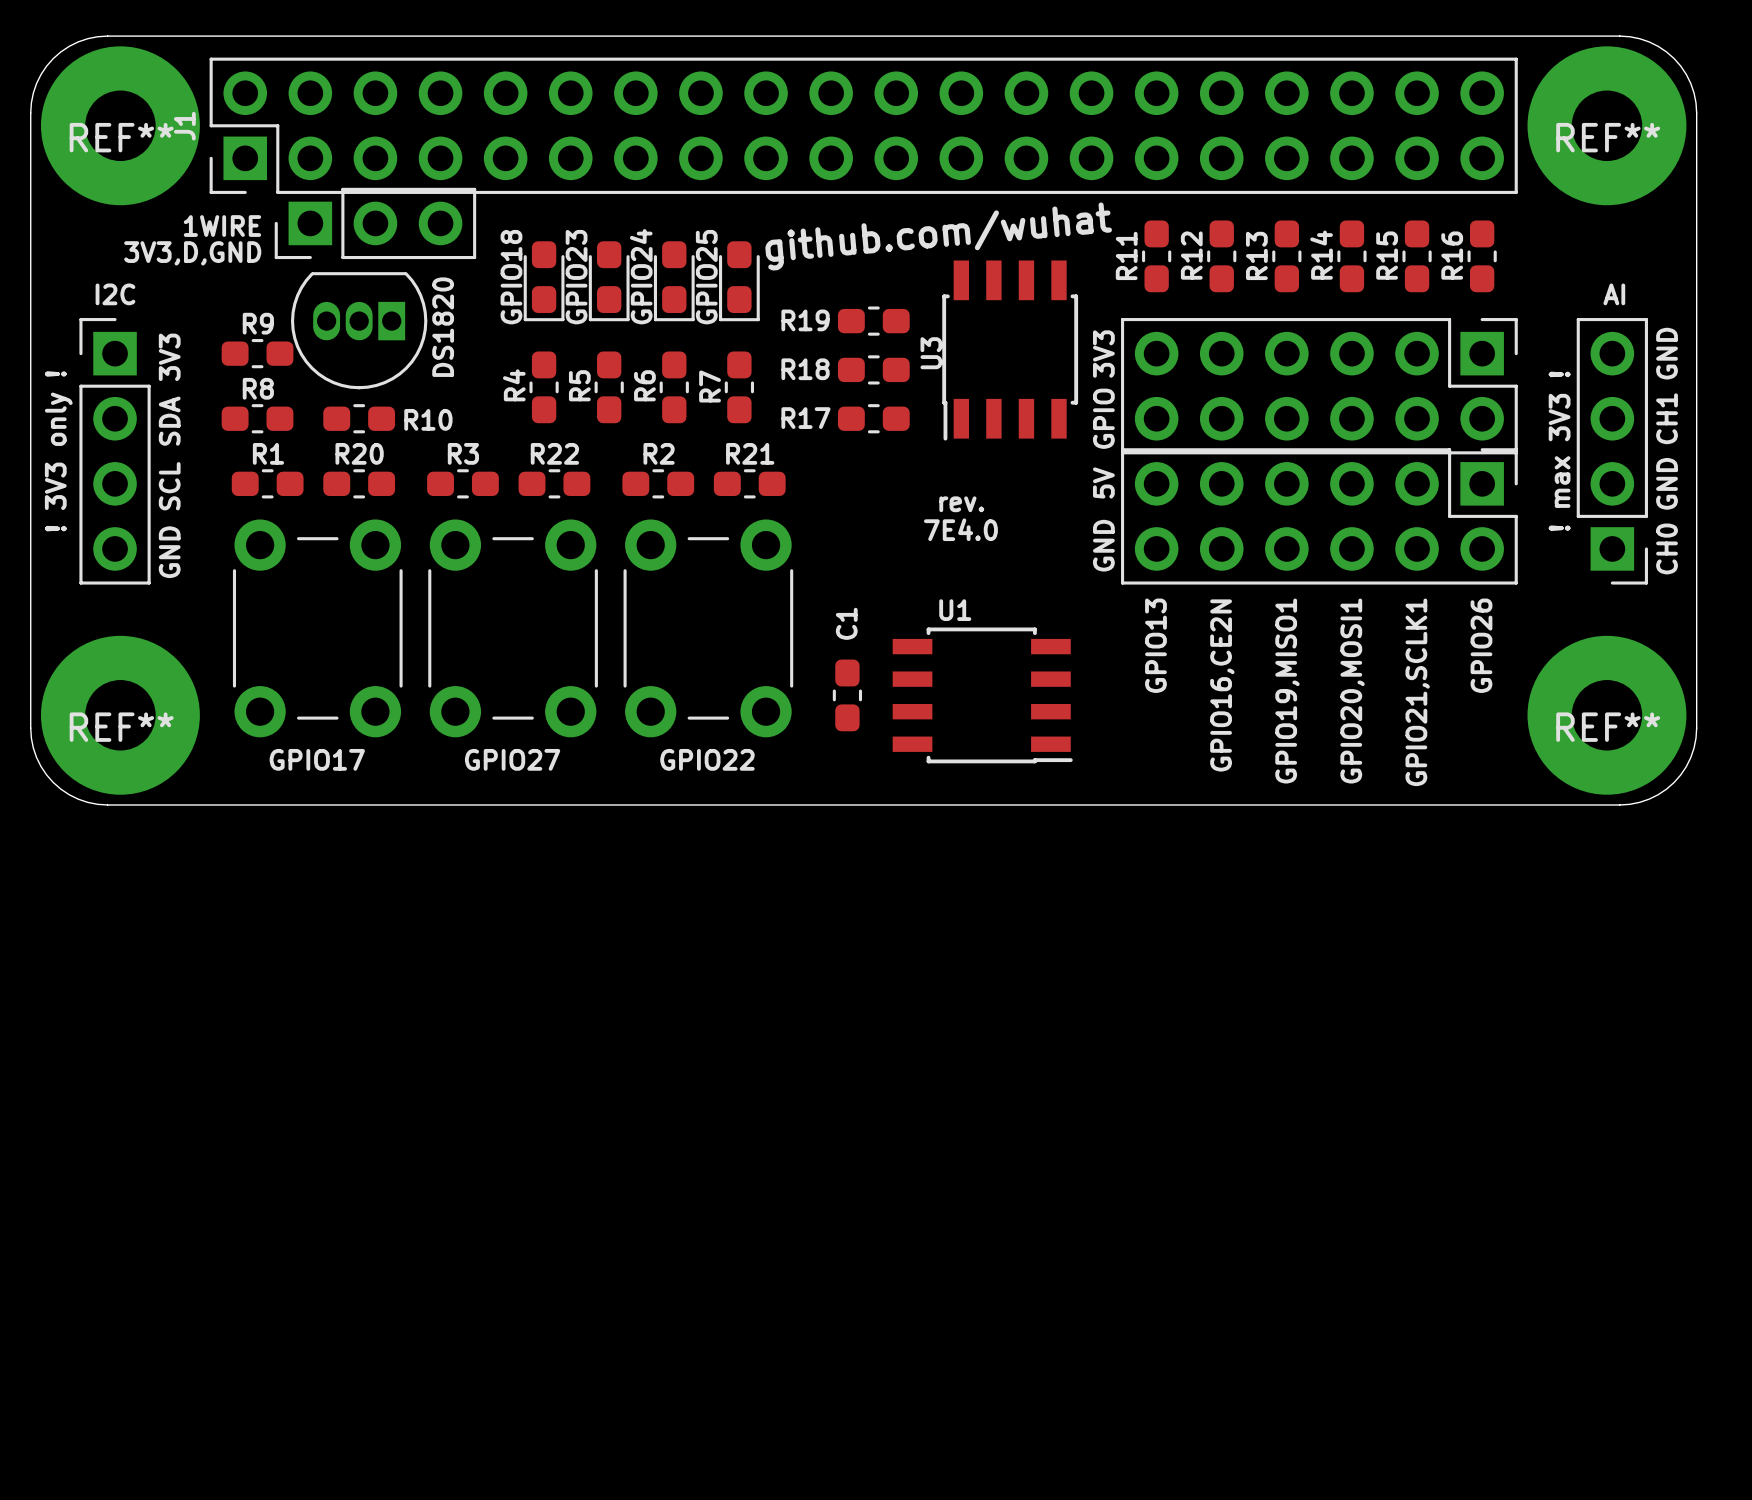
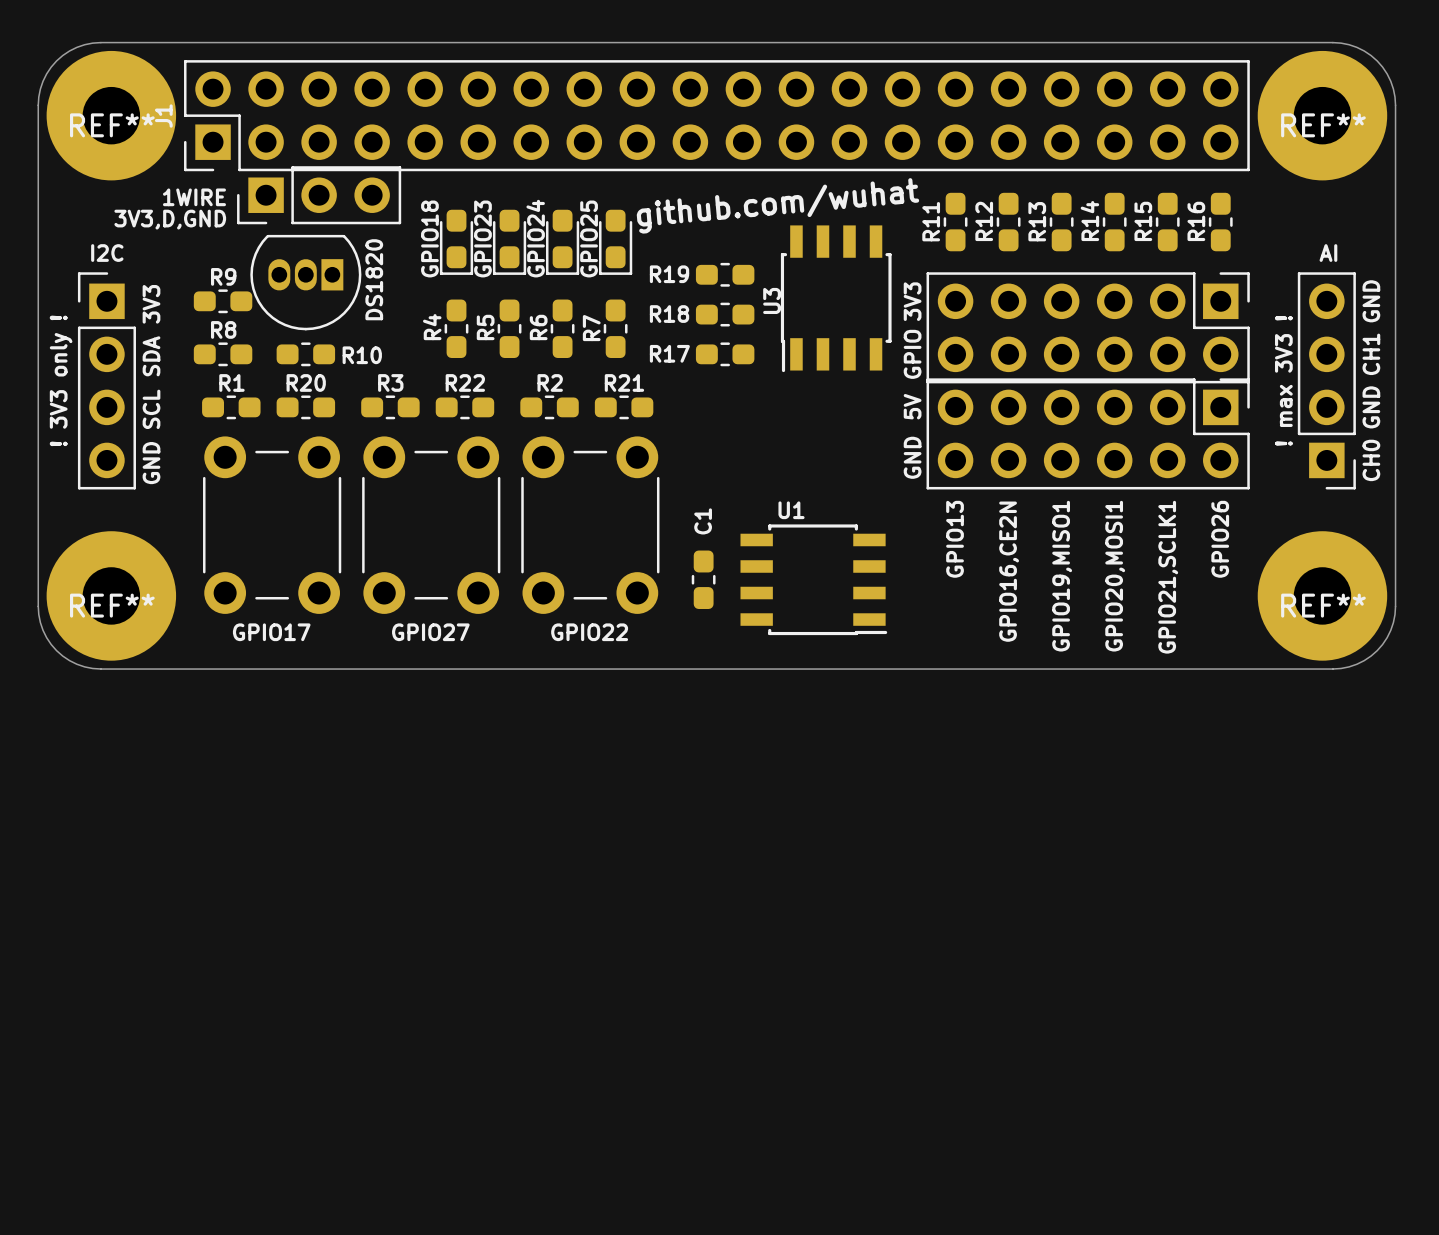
text: rev. (961, 504) -> none
text: 7E4.0 (960, 529) -> none

